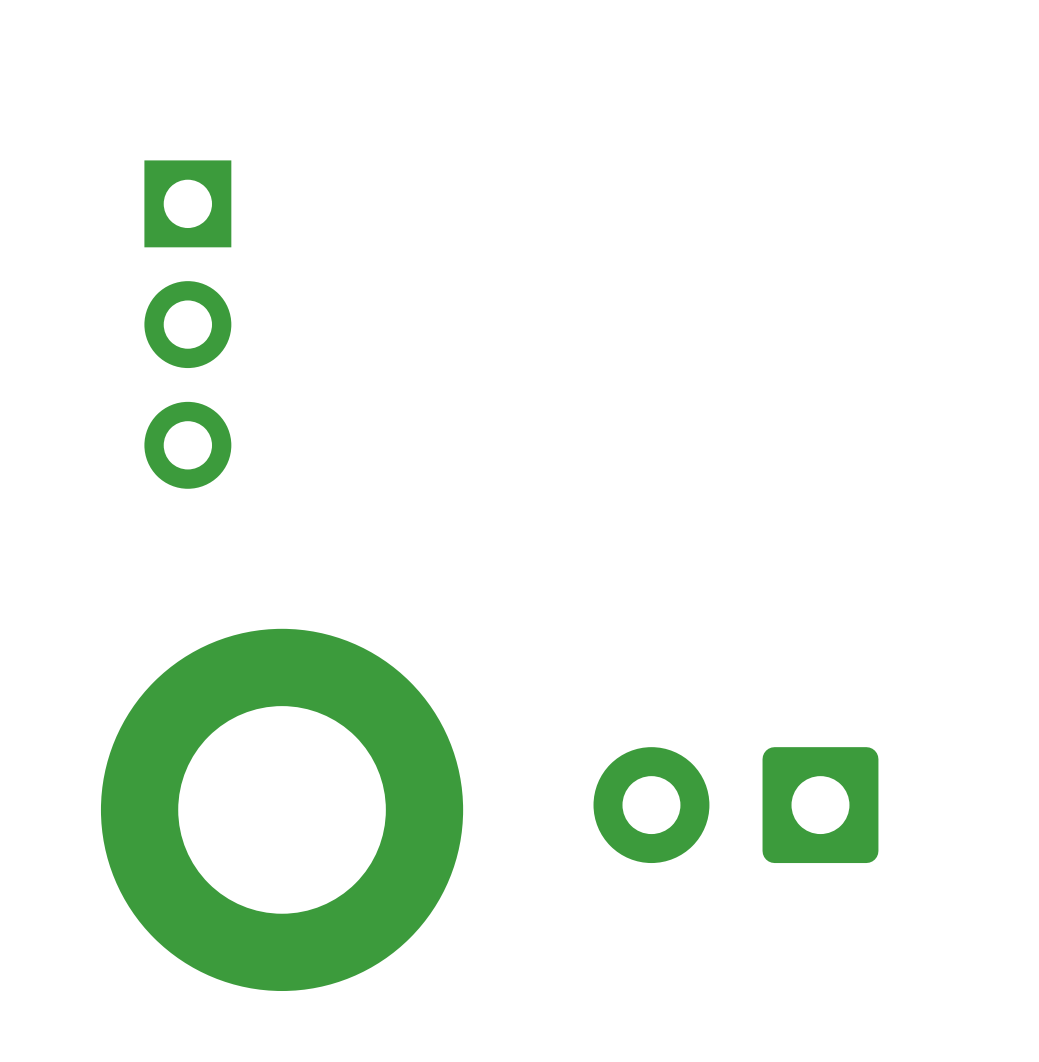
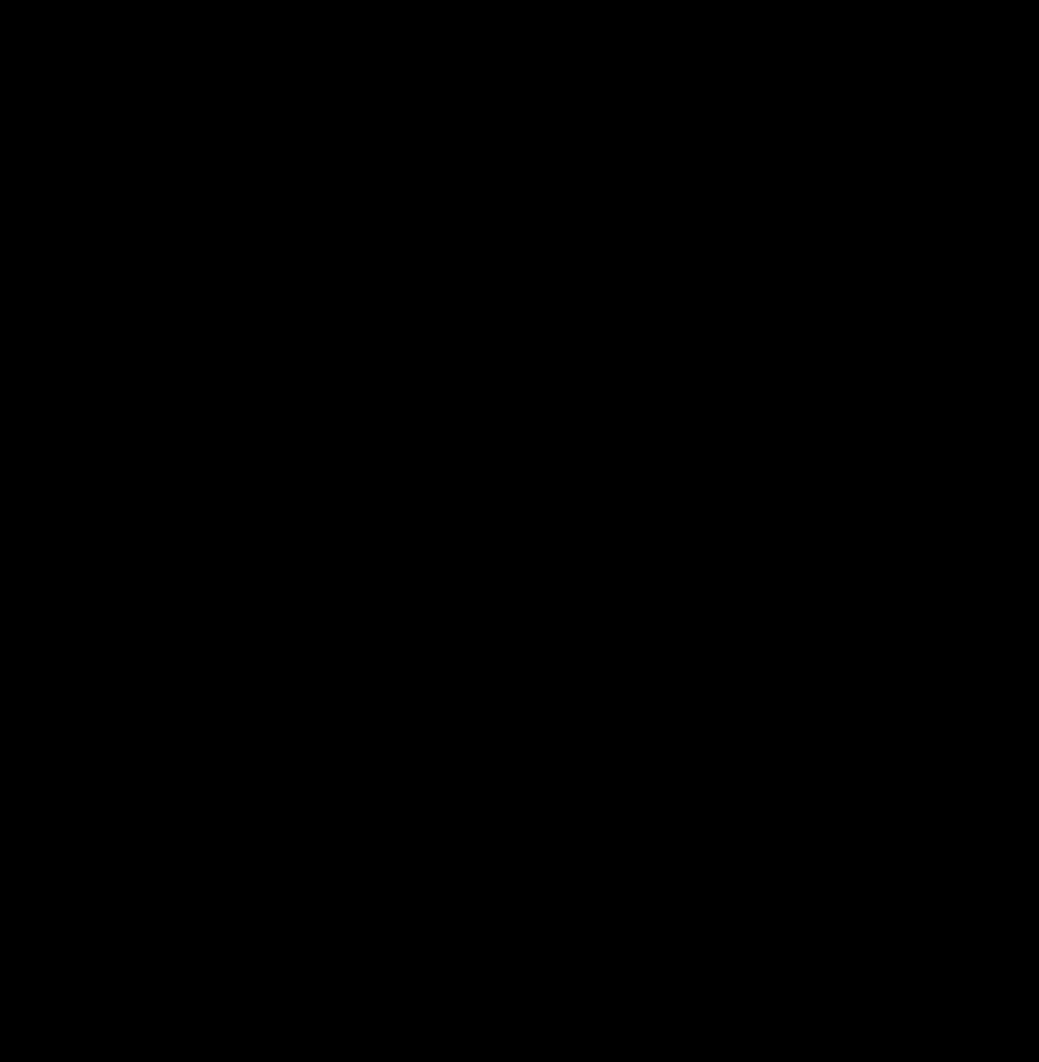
part: (187, 324) -> none
part: (735, 805) -> none
part: (282, 809) -> none

